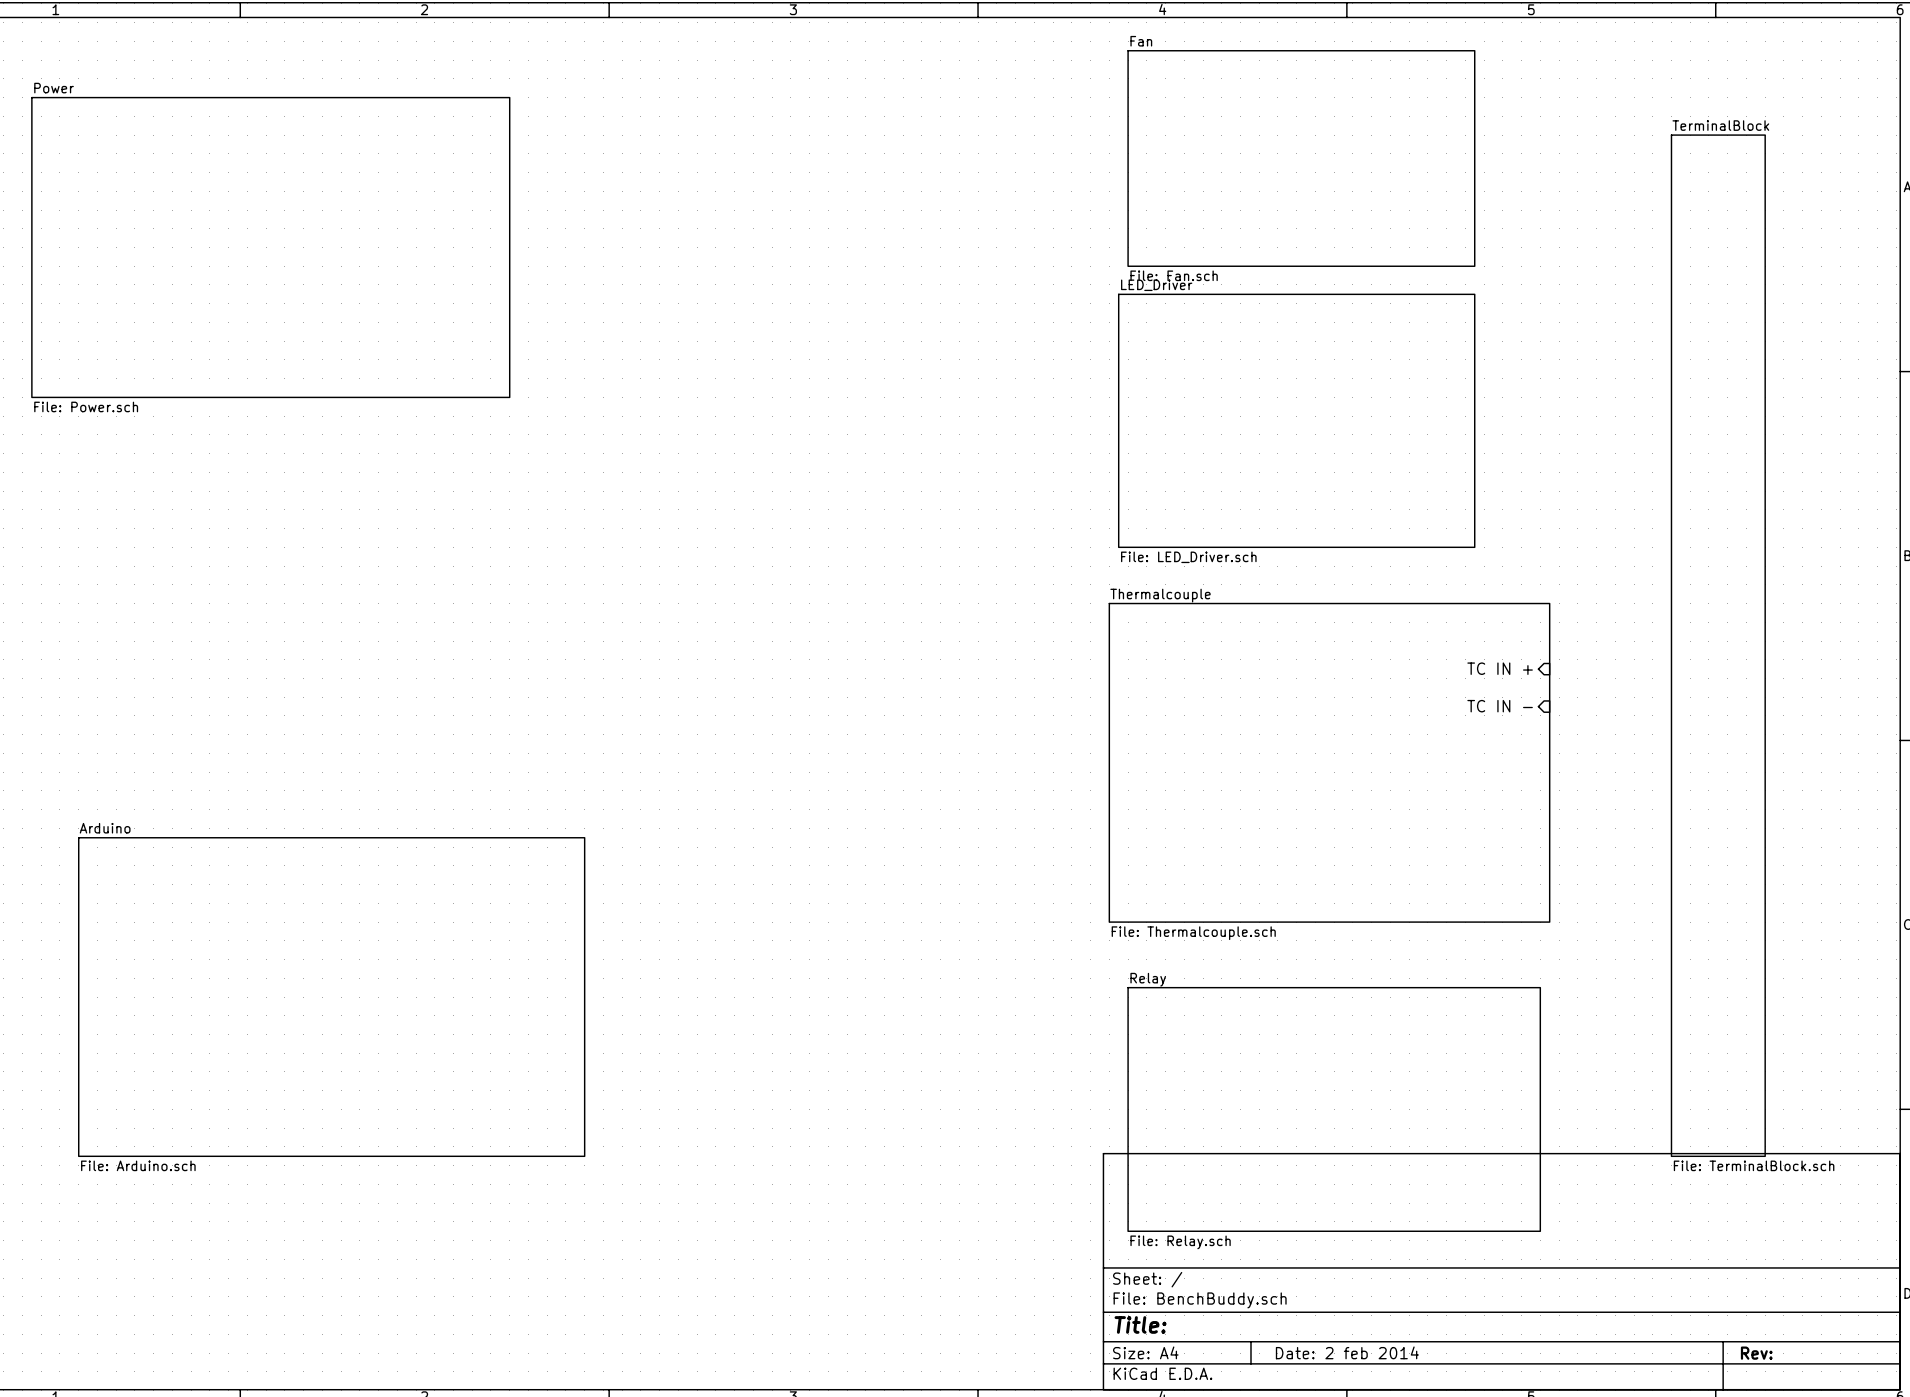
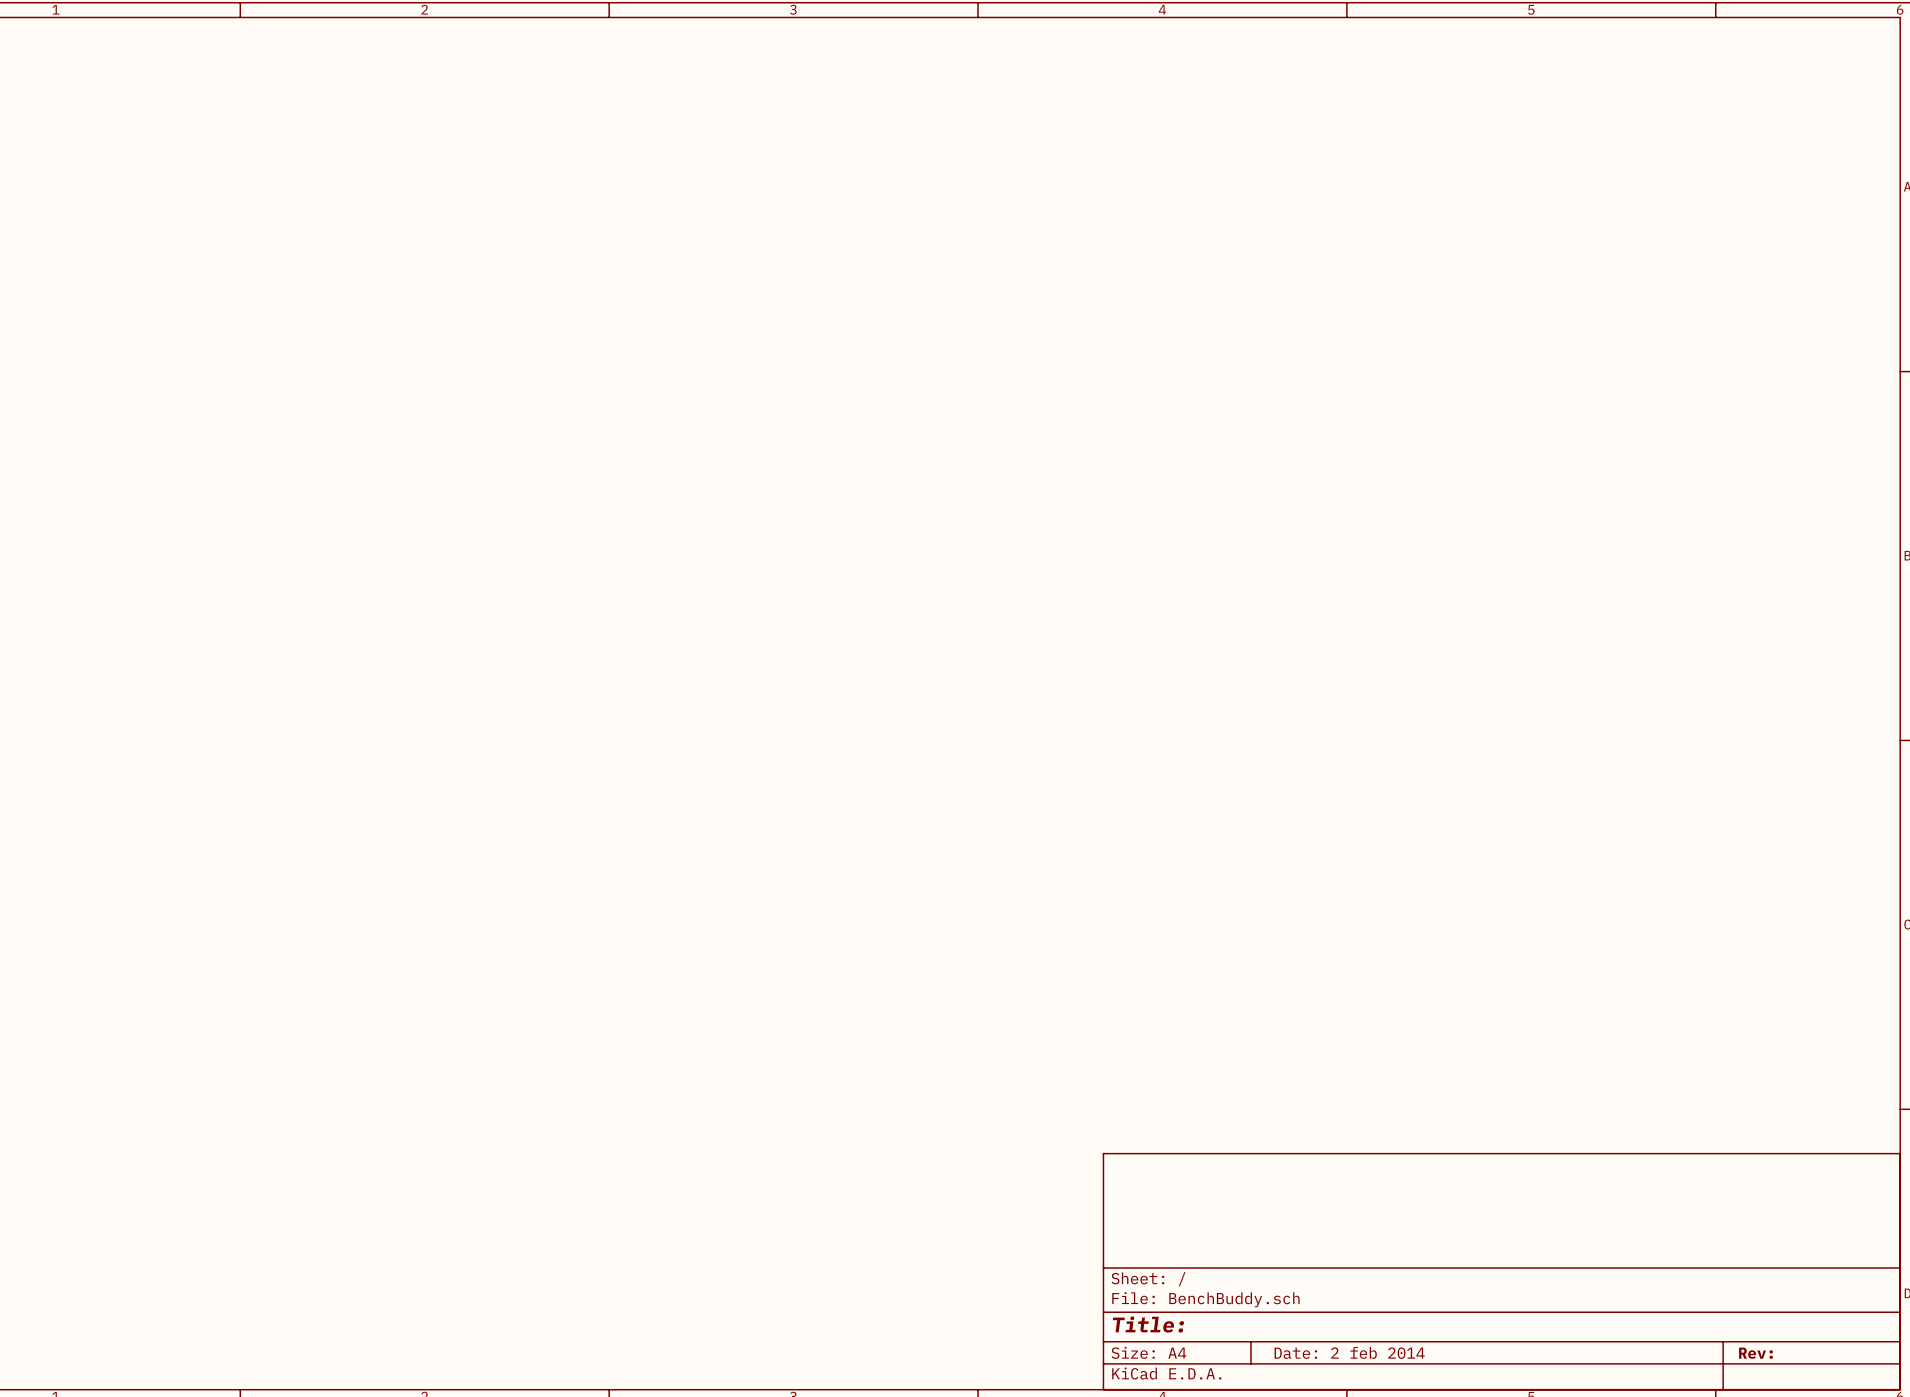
sheet Fan: File: Fan.sch (1301, 158) -> none
sheet Power: File: Power.sch (270, 247) -> none
sheet LED_Driver: File: LED_Driver.sch (1296, 420) -> none
sheet TerminalBlock: File: TerminalBlock.sch (1718, 645) -> none
sheet pin: TC IN + (1500, 668) -> none
sheet pin: TC IN - (1500, 706) -> none
sheet Thermalcouple: File: Thermalcouple.sch (1329, 762) -> none
sheet Arduino: File: Arduino.sch (331, 997) -> none
sheet Relay: File: Relay.sch (1334, 1109) -> none

